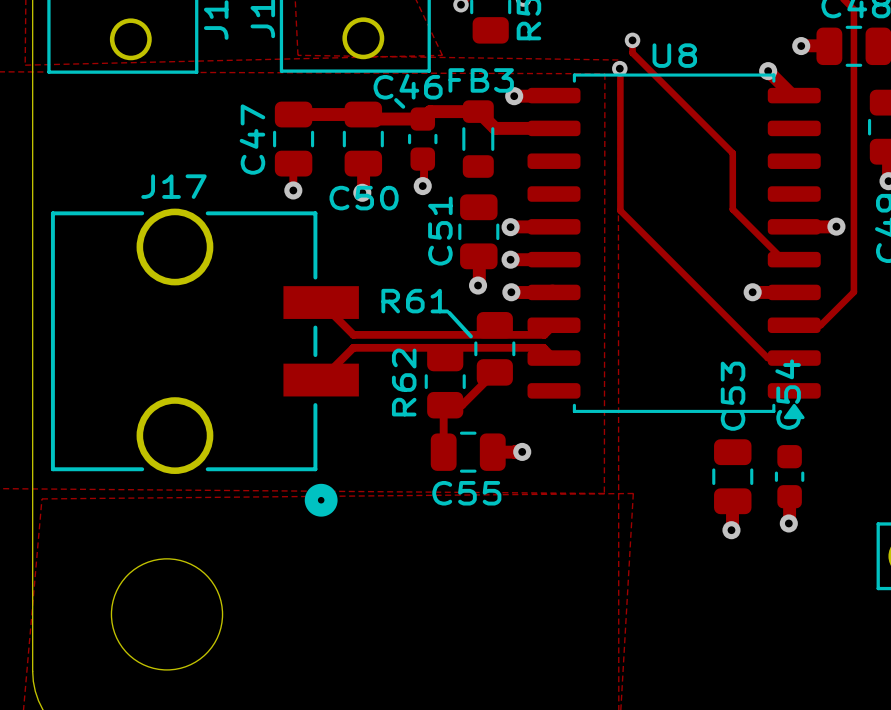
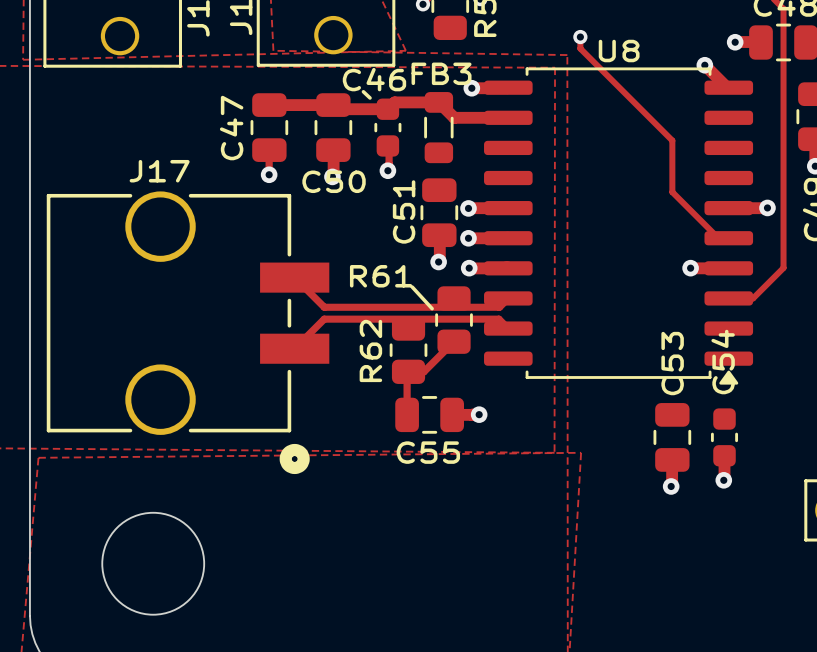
via: (619, 68) -> none
track: (620, 68) (620, 210) (767, 358) (794, 358) -> none

